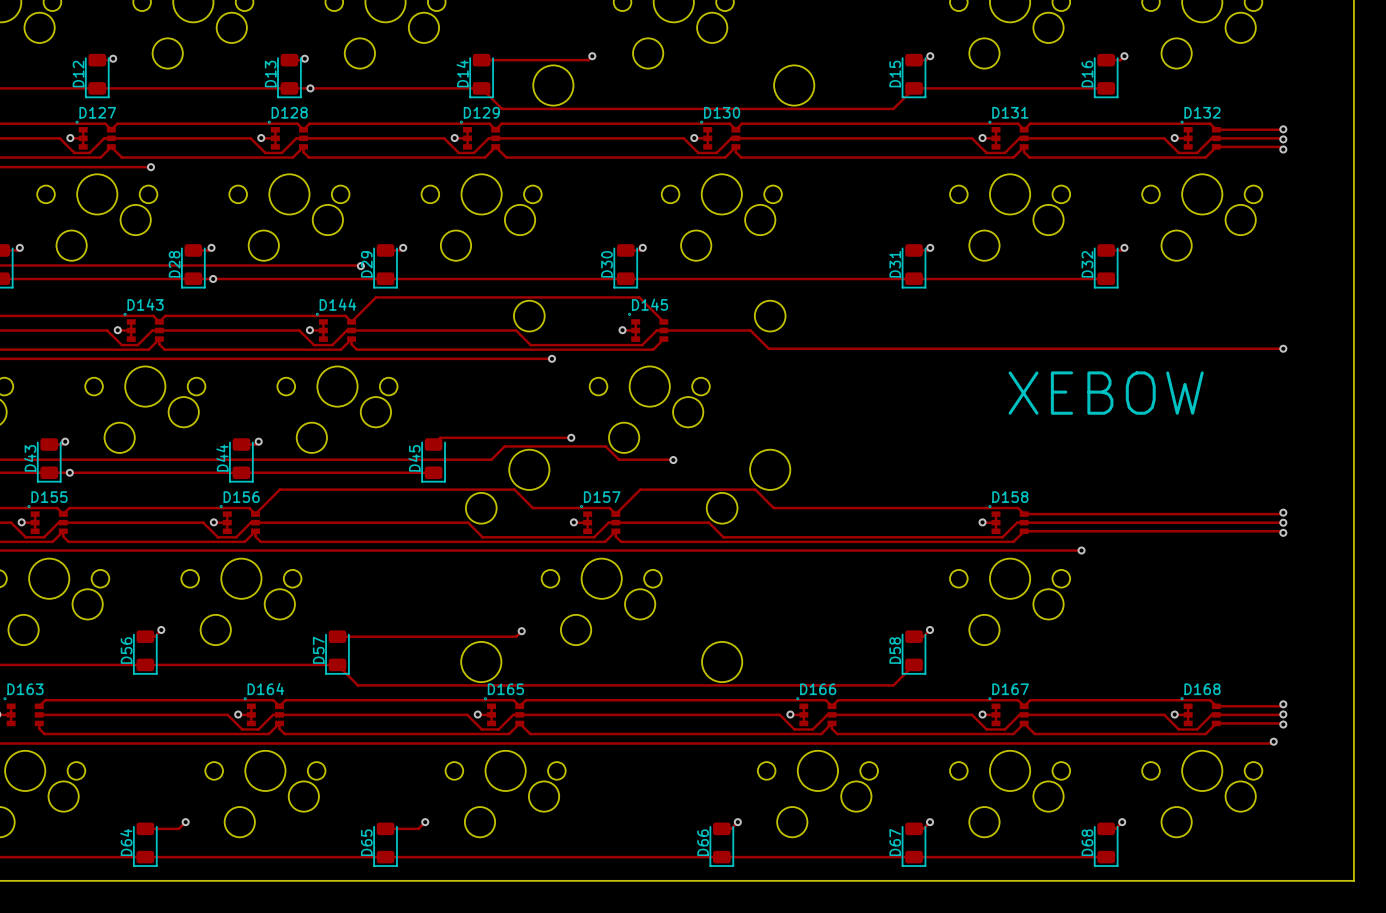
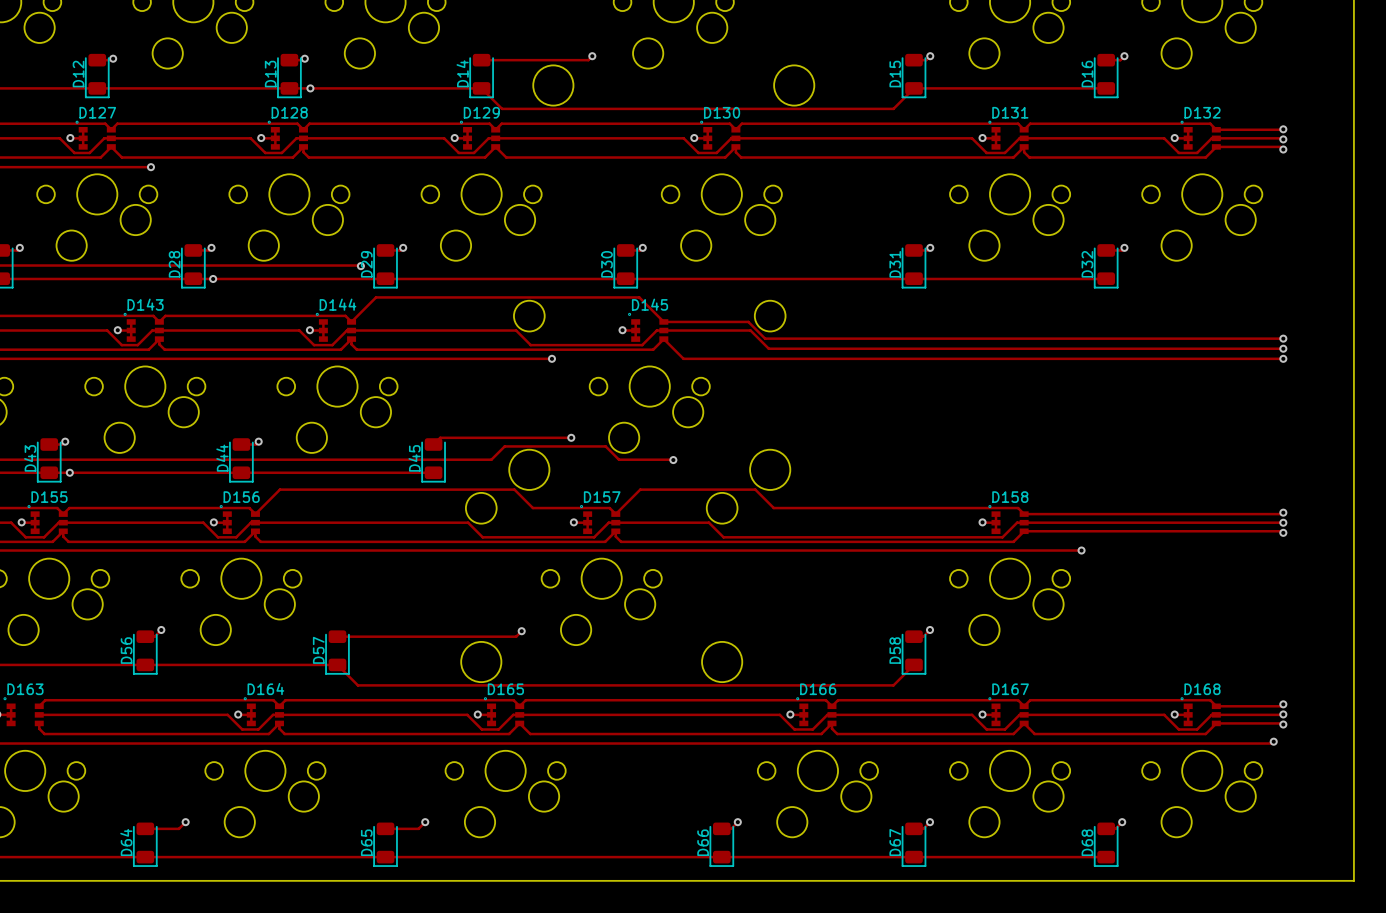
track: none -> (663, 321) (748, 321) (765, 338) (1283, 338)
via: none -> (1283, 338)
track: none -> (663, 339) (683, 358) (1283, 358)
via: none -> (1283, 358)
text: XEBOW (1106, 393) -> none

